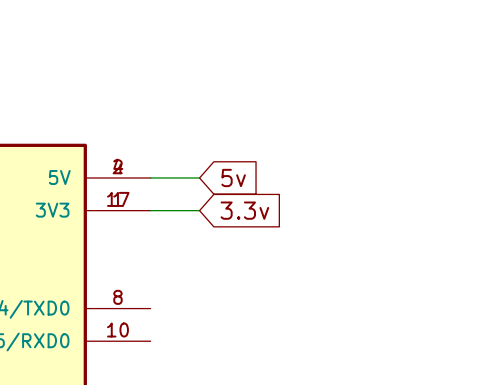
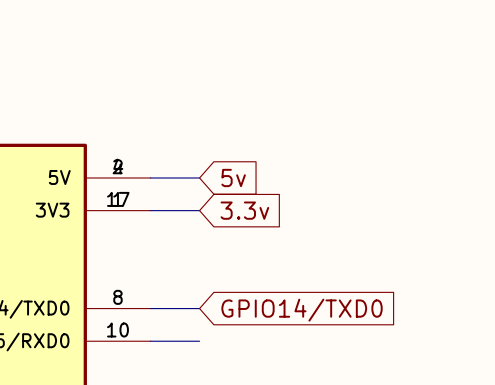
wire: none -> (150, 308) (199, 308)
global label: none -> GPIO14/TXD0 (302, 310)
wire: none -> (150, 341) (199, 341)

